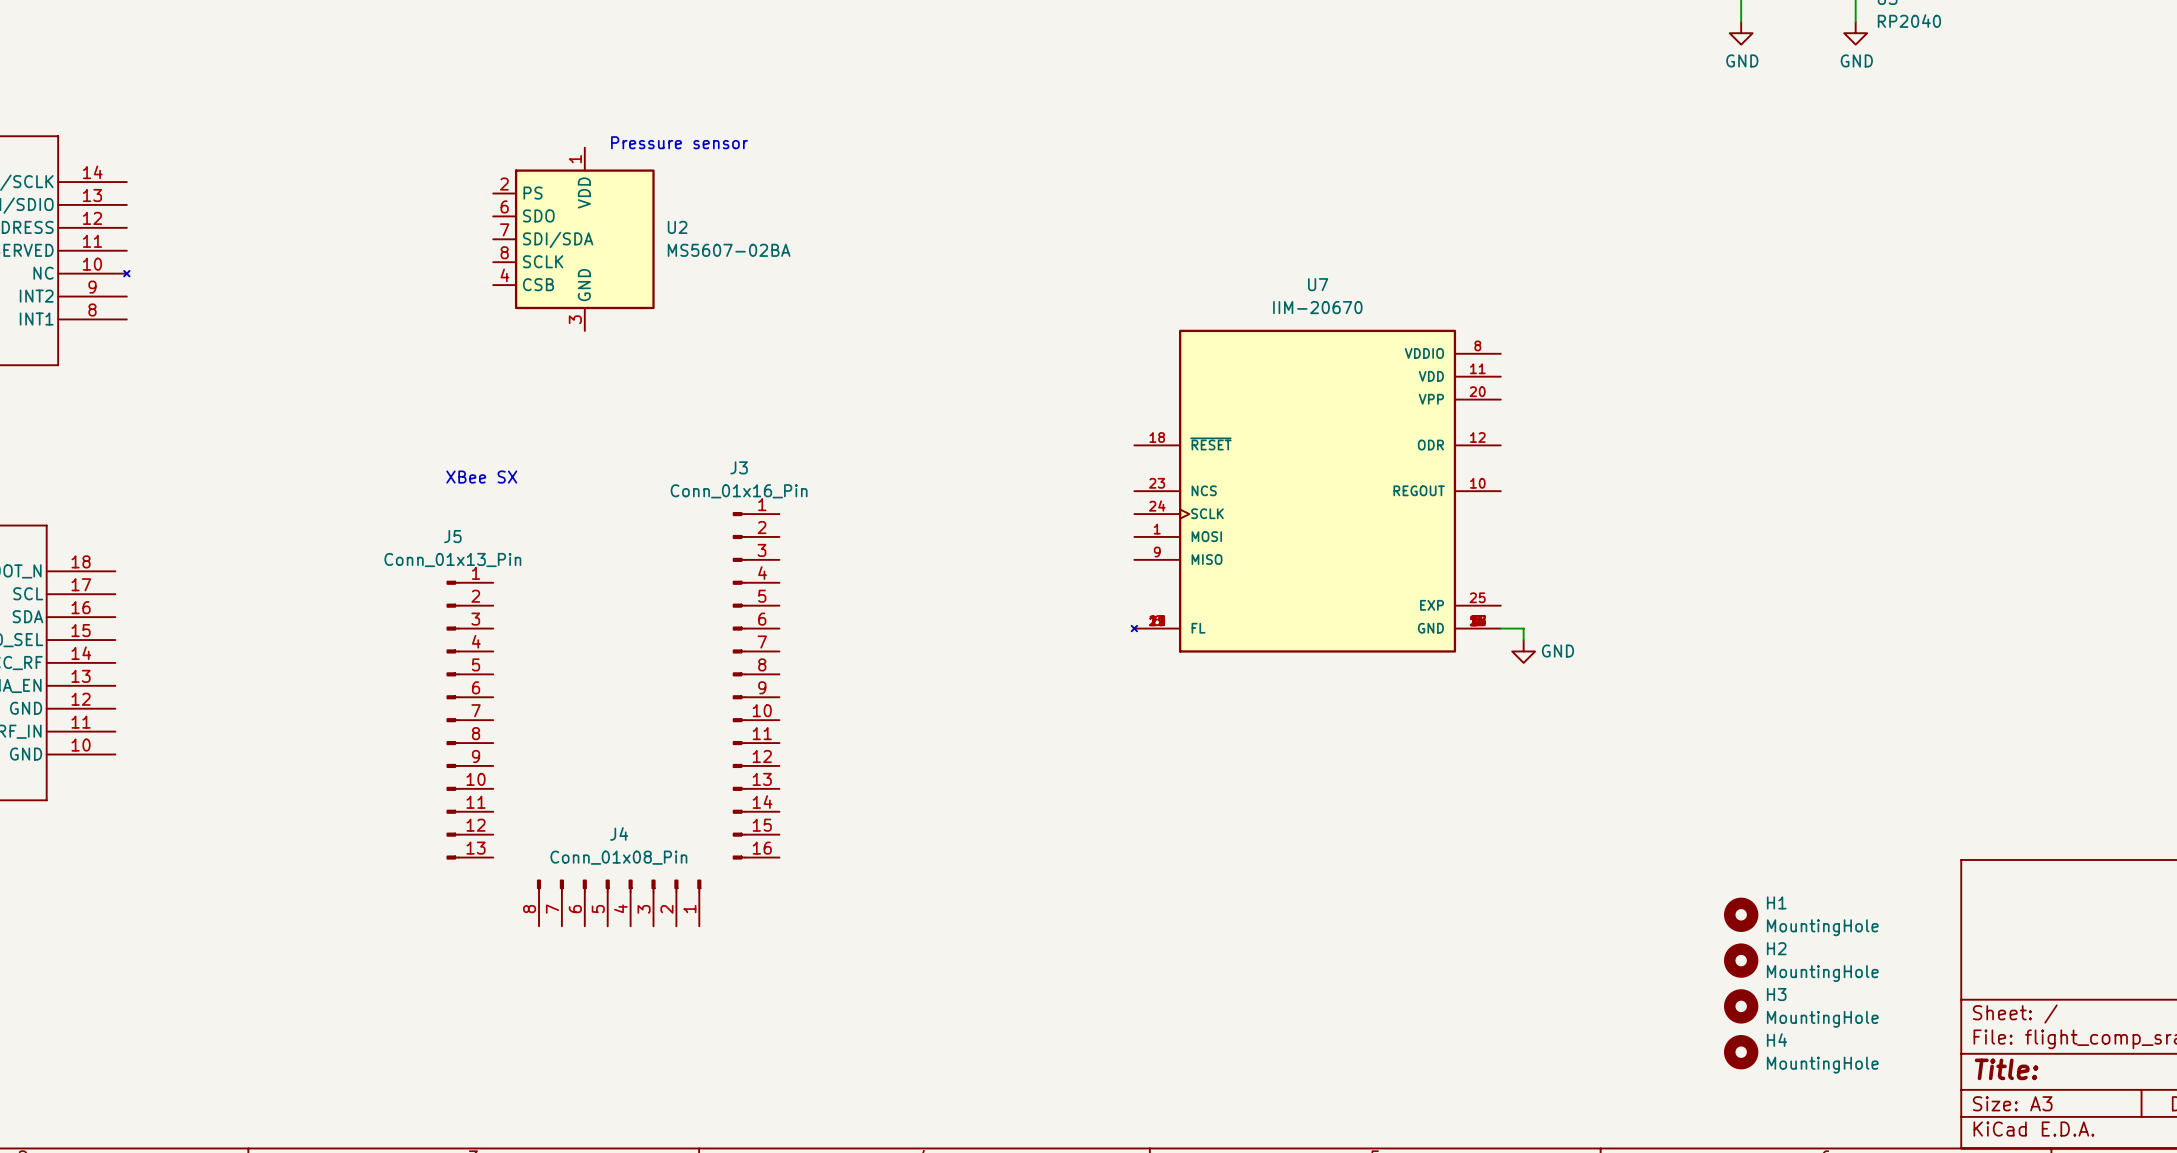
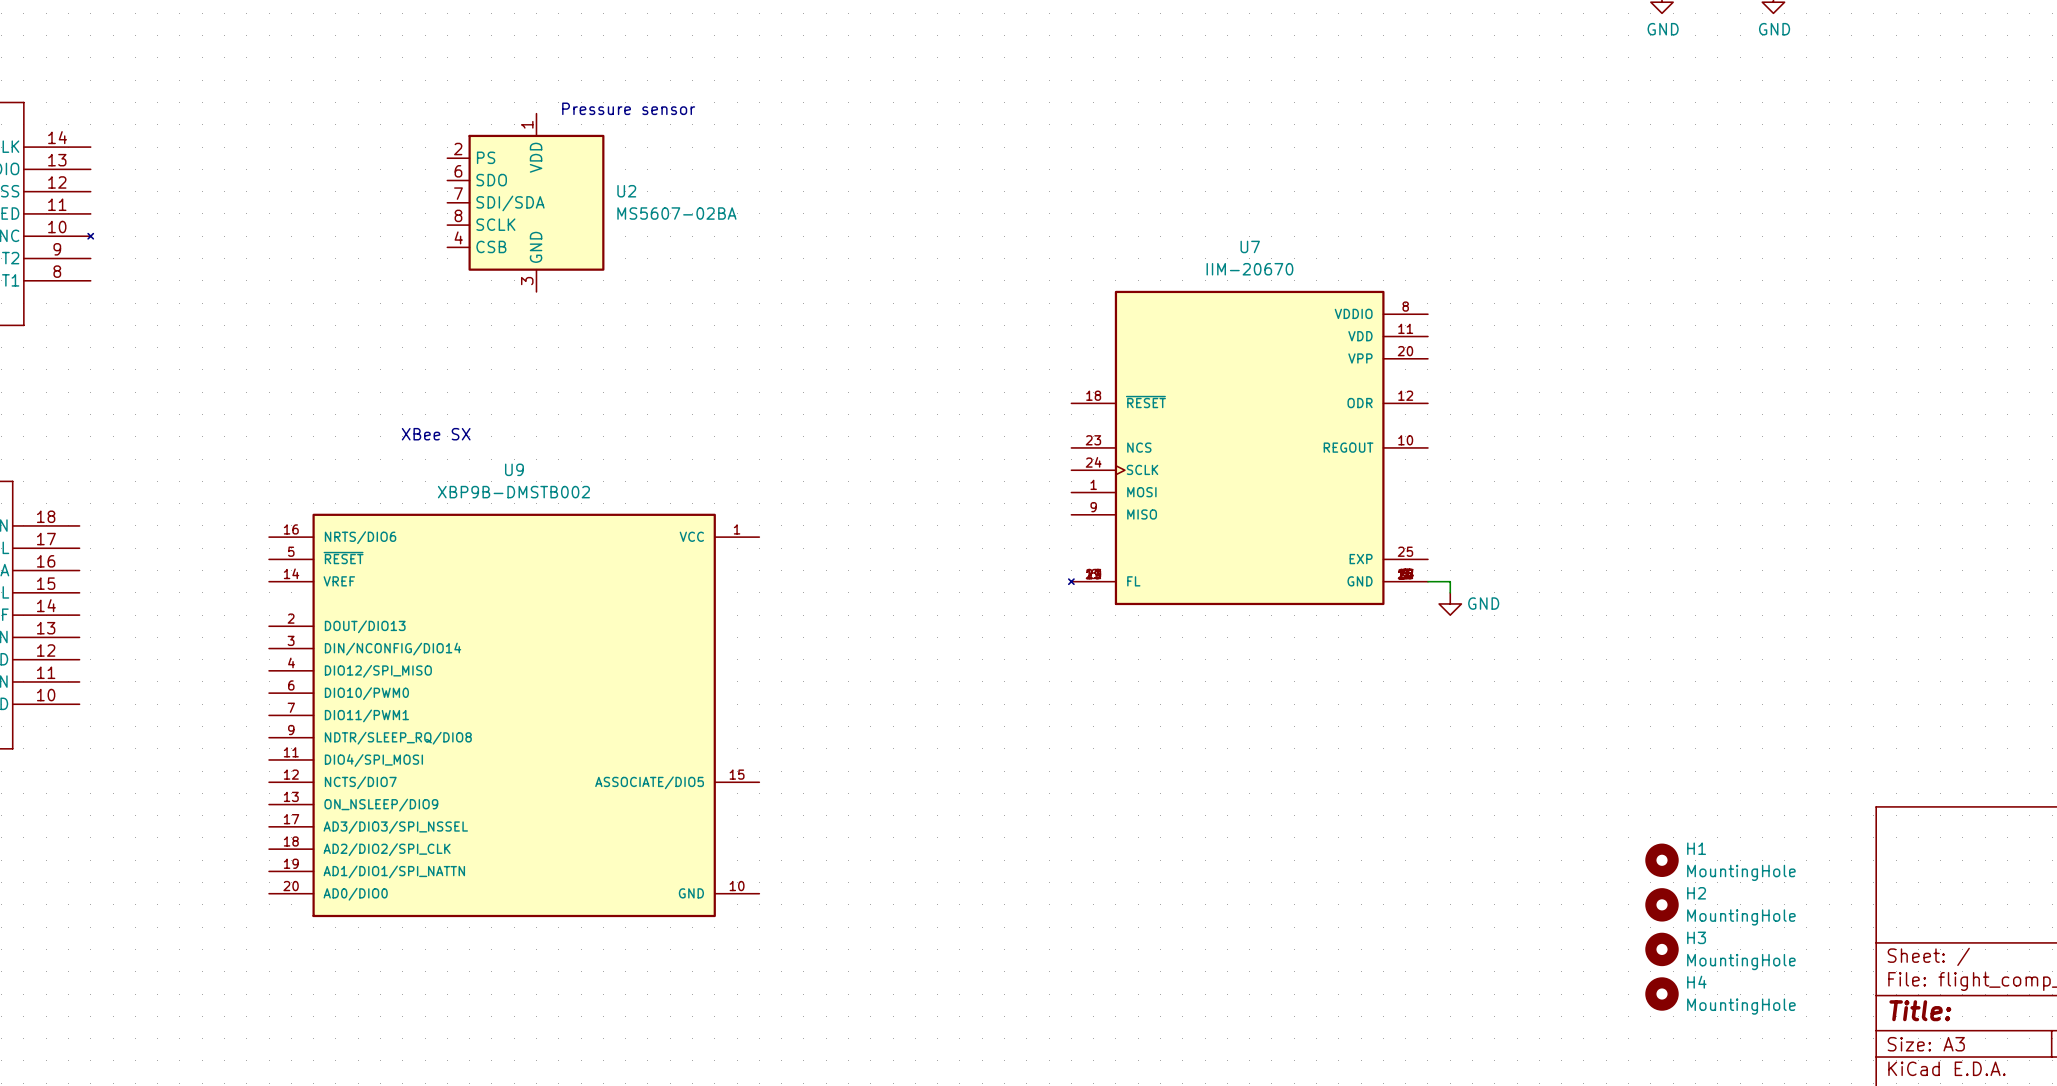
J3: Conn_01x16_Pin (756, 685) -> none
J5: Conn_01x13_Pin (469, 720) -> none
U9: none -> XBP9B-DMSTB002 (514, 715)
J4: Conn_01x08_Pin (619, 903) -> none

